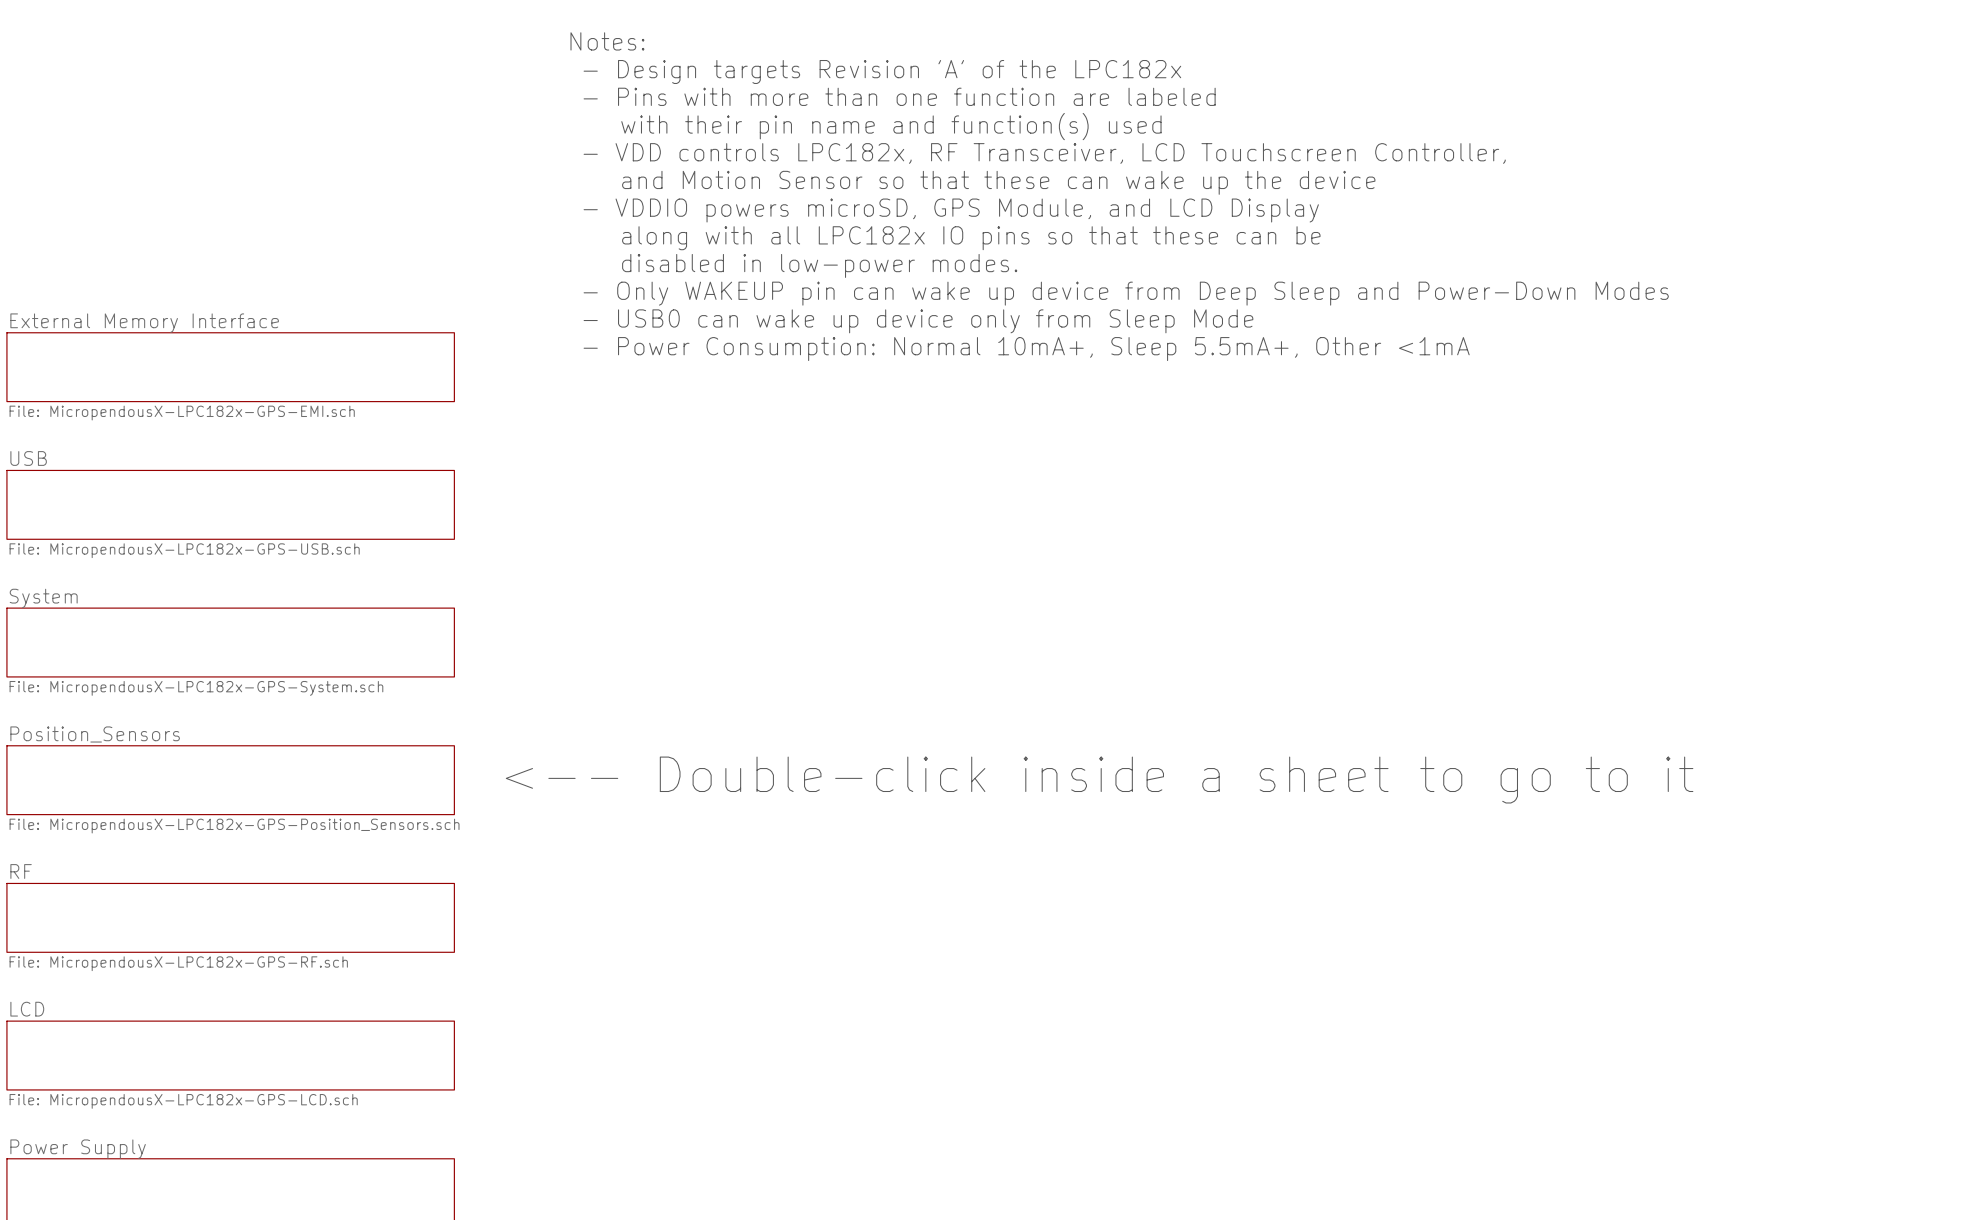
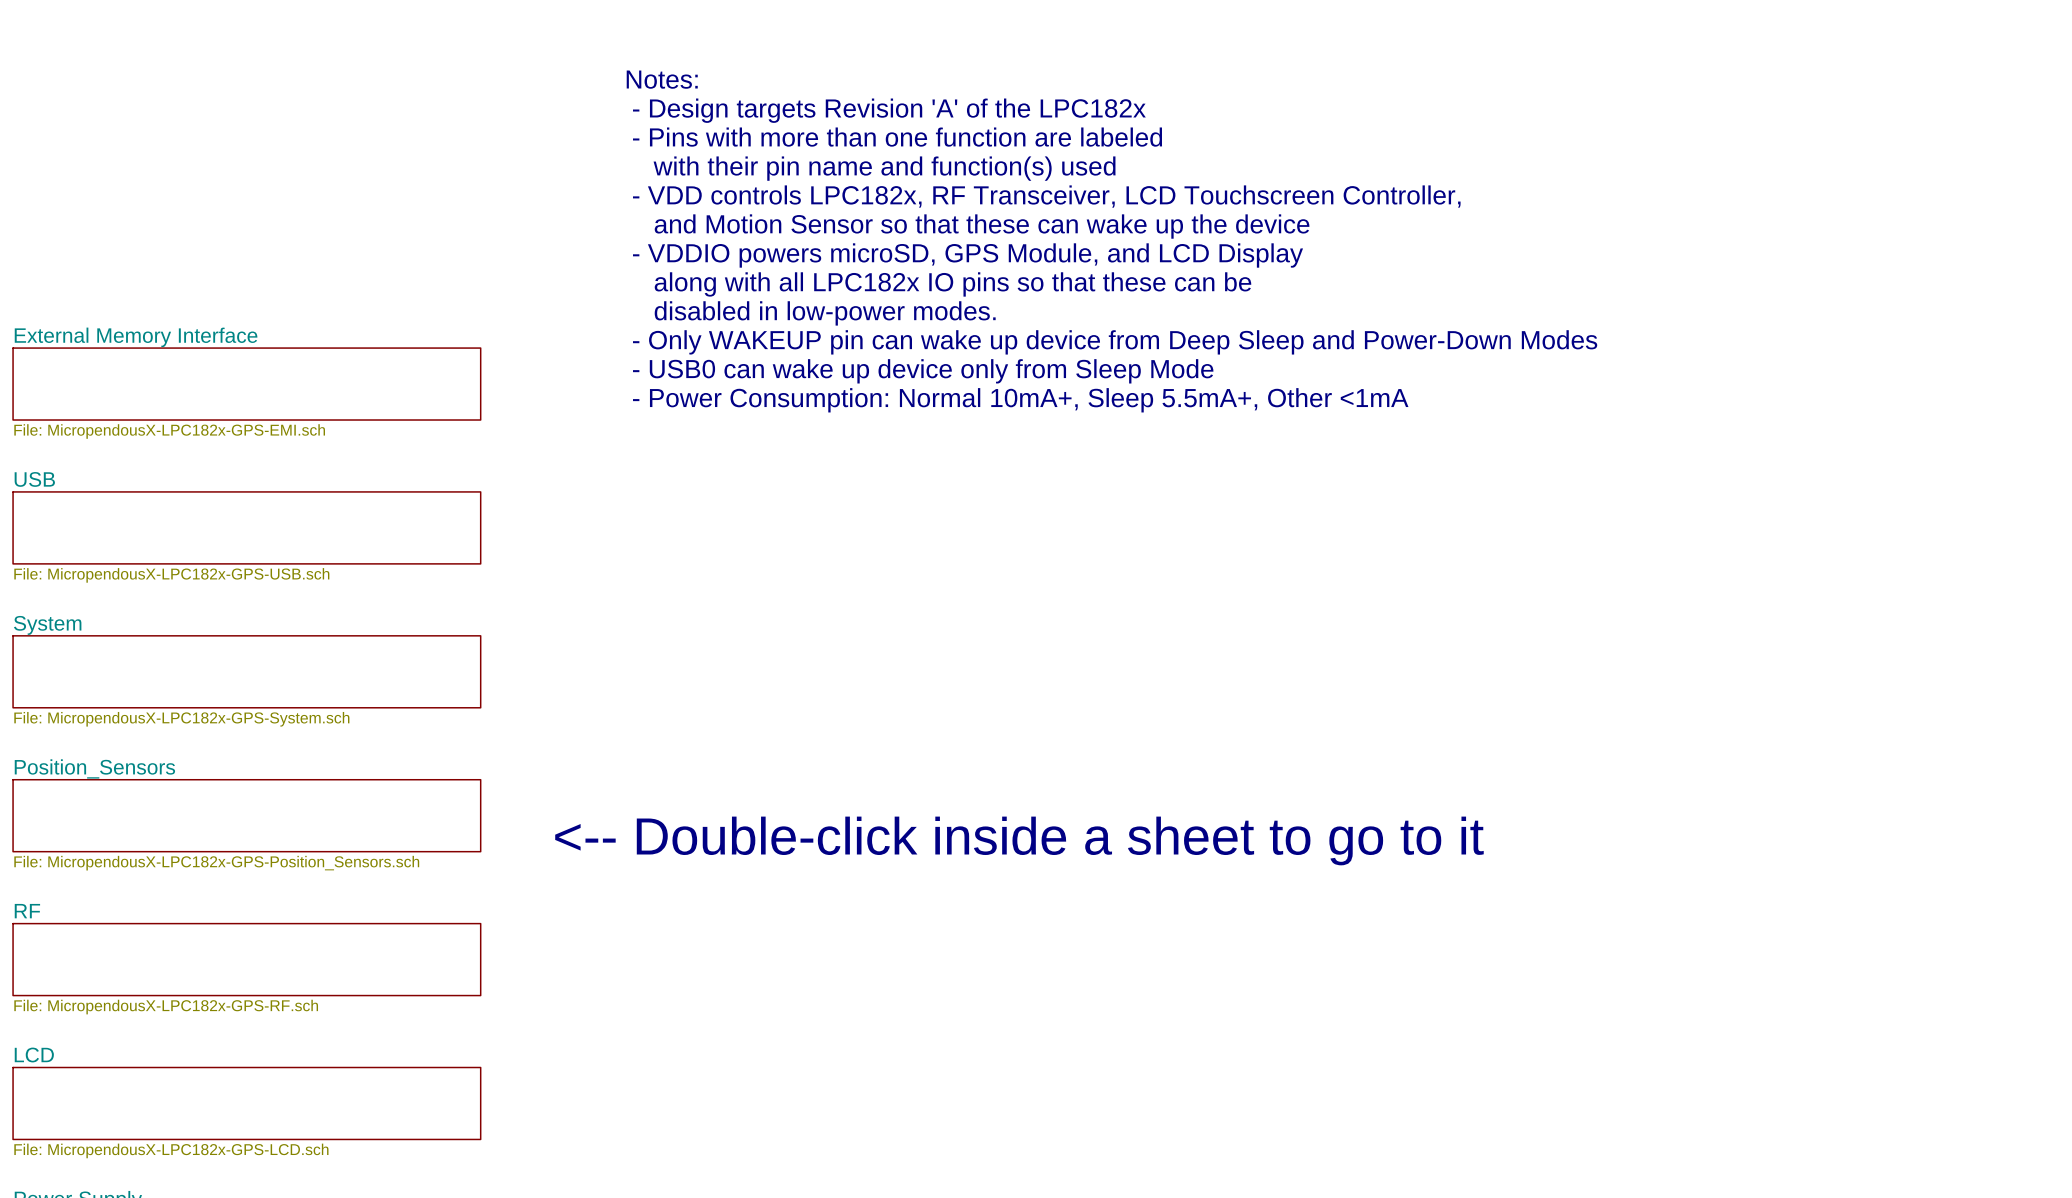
text position: Notes: (607, 41) -> Notes: (662, 79)
text position: - Design targets Revision 'A' of the LPC182x (882, 71) -> - Design targets Revision 'A' of the LPC182x (889, 110)
text position: - Pins with more than one function are labeled (899, 96) -> - Pins with more than one function are labeled (897, 137)
text position: with their pin name and function(s) used (891, 126) -> with their pin name and function(s) used (884, 168)
text position: - VDD controls LPC182x, RF Transceiver, LCD Touchscreen Controller, (1044, 153) -> - VDD controls LPC182x, RF Transceiver, LCD Touchscreen Controller, (1046, 196)
text position: and Motion Sensor so that these can wake up the device (998, 182) -> and Motion Sensor so that these can wake up the device (982, 226)
text position: - VDDIO powers microSD, GPS Module, and LCD Display (951, 210) -> - VDDIO powers microSD, GPS Module, and LCD Display (968, 255)
text position: along with all LPC182x IO pins so that these can be (971, 238) -> along with all LPC182x IO pins so that these can be (952, 284)
text position: disabled in low-power modes. (819, 265) -> disabled in low-power modes. (825, 313)
text position: - Only WAKEUP pin can wake up device from Deep Sleep and Power-Down Modes (1126, 293) -> - Only WAKEUP pin can wake up device from Deep Sleep and Power-Down Modes (1115, 342)
text position: - USB0 can wake up device only from Sleep Mode (918, 321) -> - USB0 can wake up device only from Sleep Mode (923, 371)
text position: - Power Consumption: Normal 10mA+, Sleep 5.5mA+, Other <1mA (1026, 349) -> - Power Consumption: Normal 10mA+, Sleep 5.5mA+, Other <1mA (1020, 400)
text position: <-- Double-click inside a sheet to go to it (1099, 780) -> <-- Double-click inside a sheet to go to it (1019, 840)

